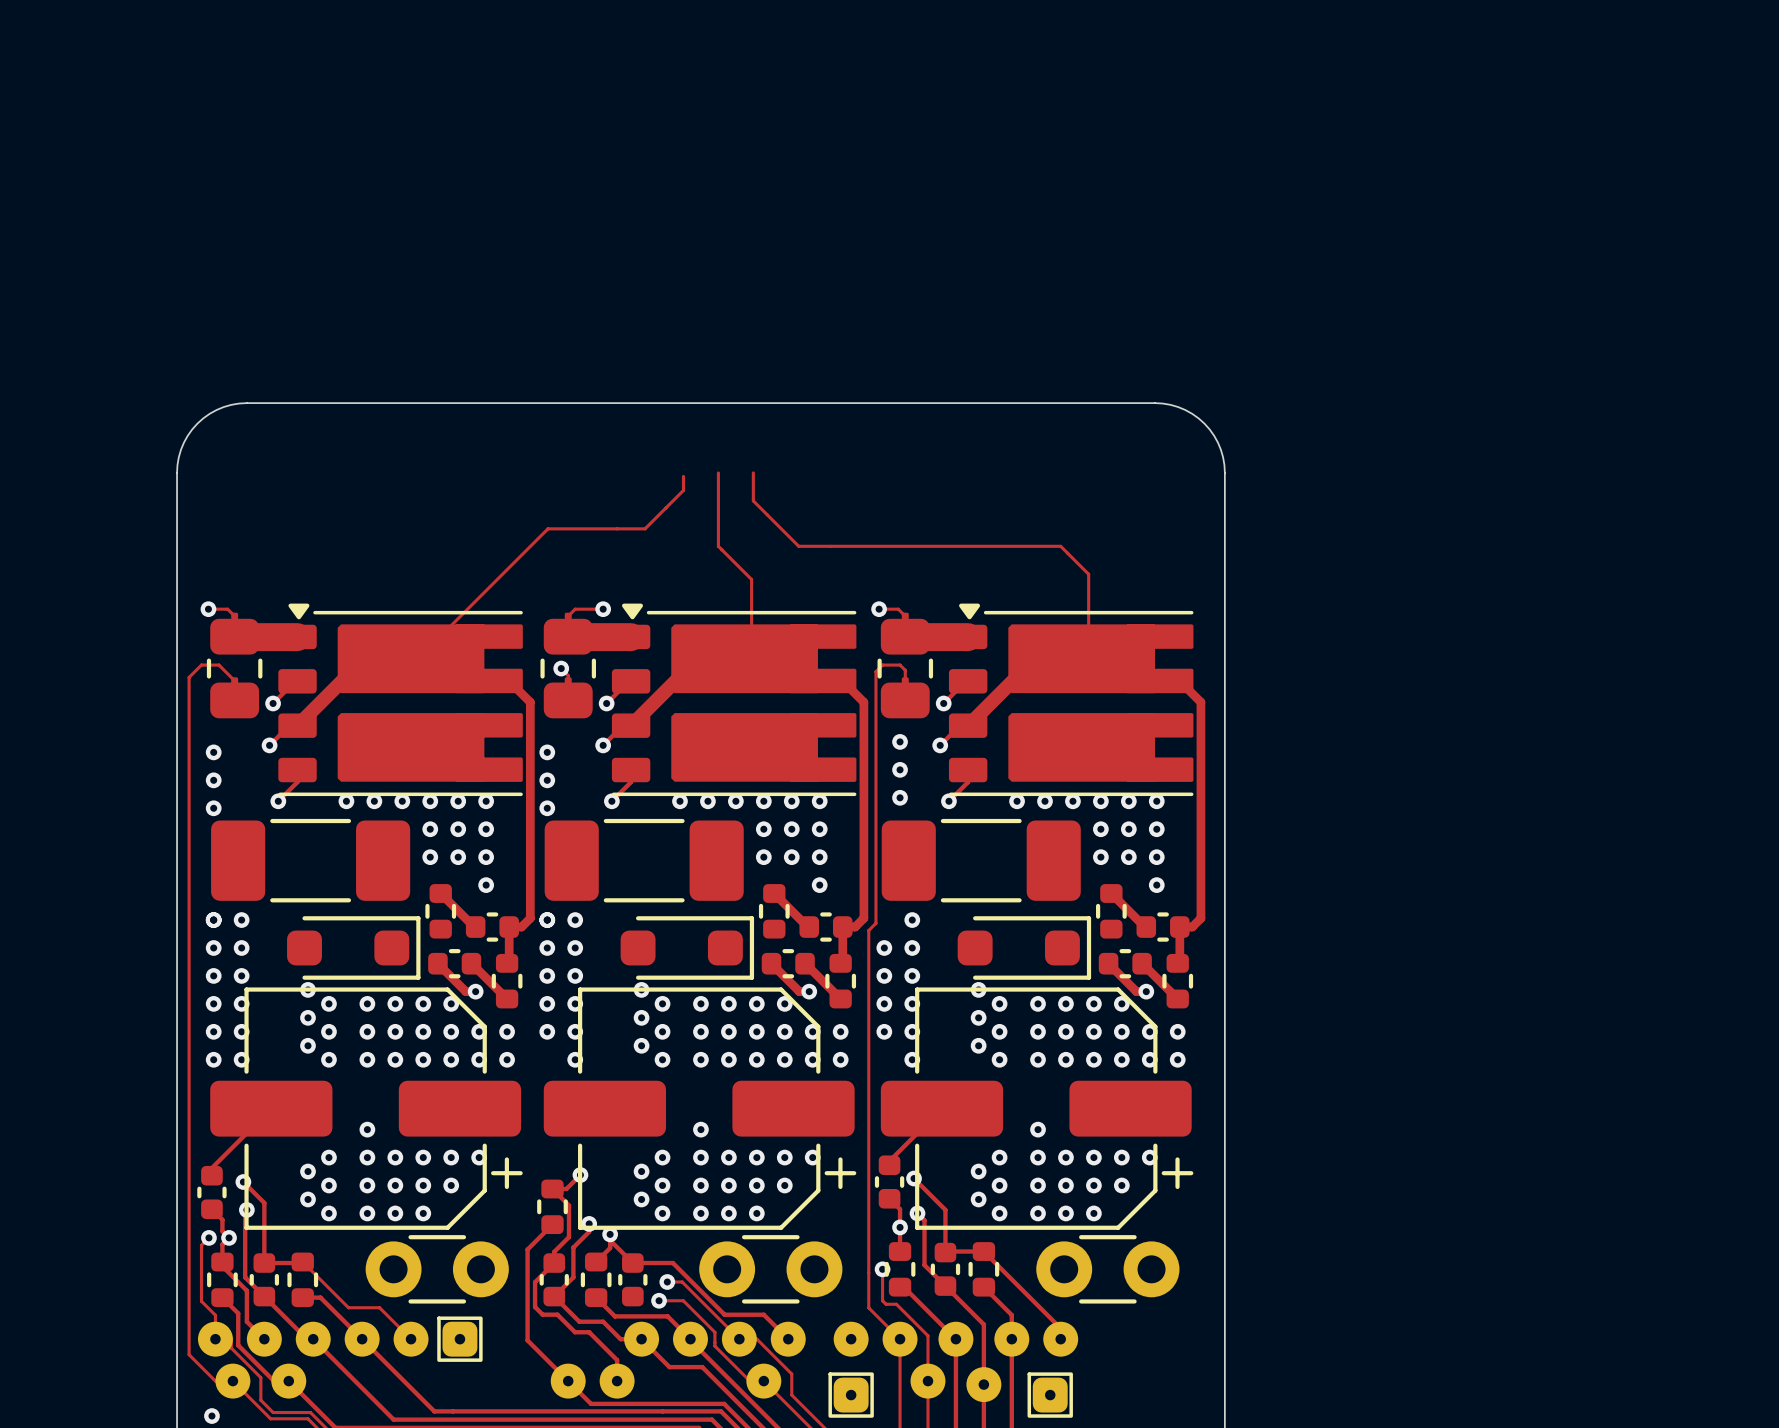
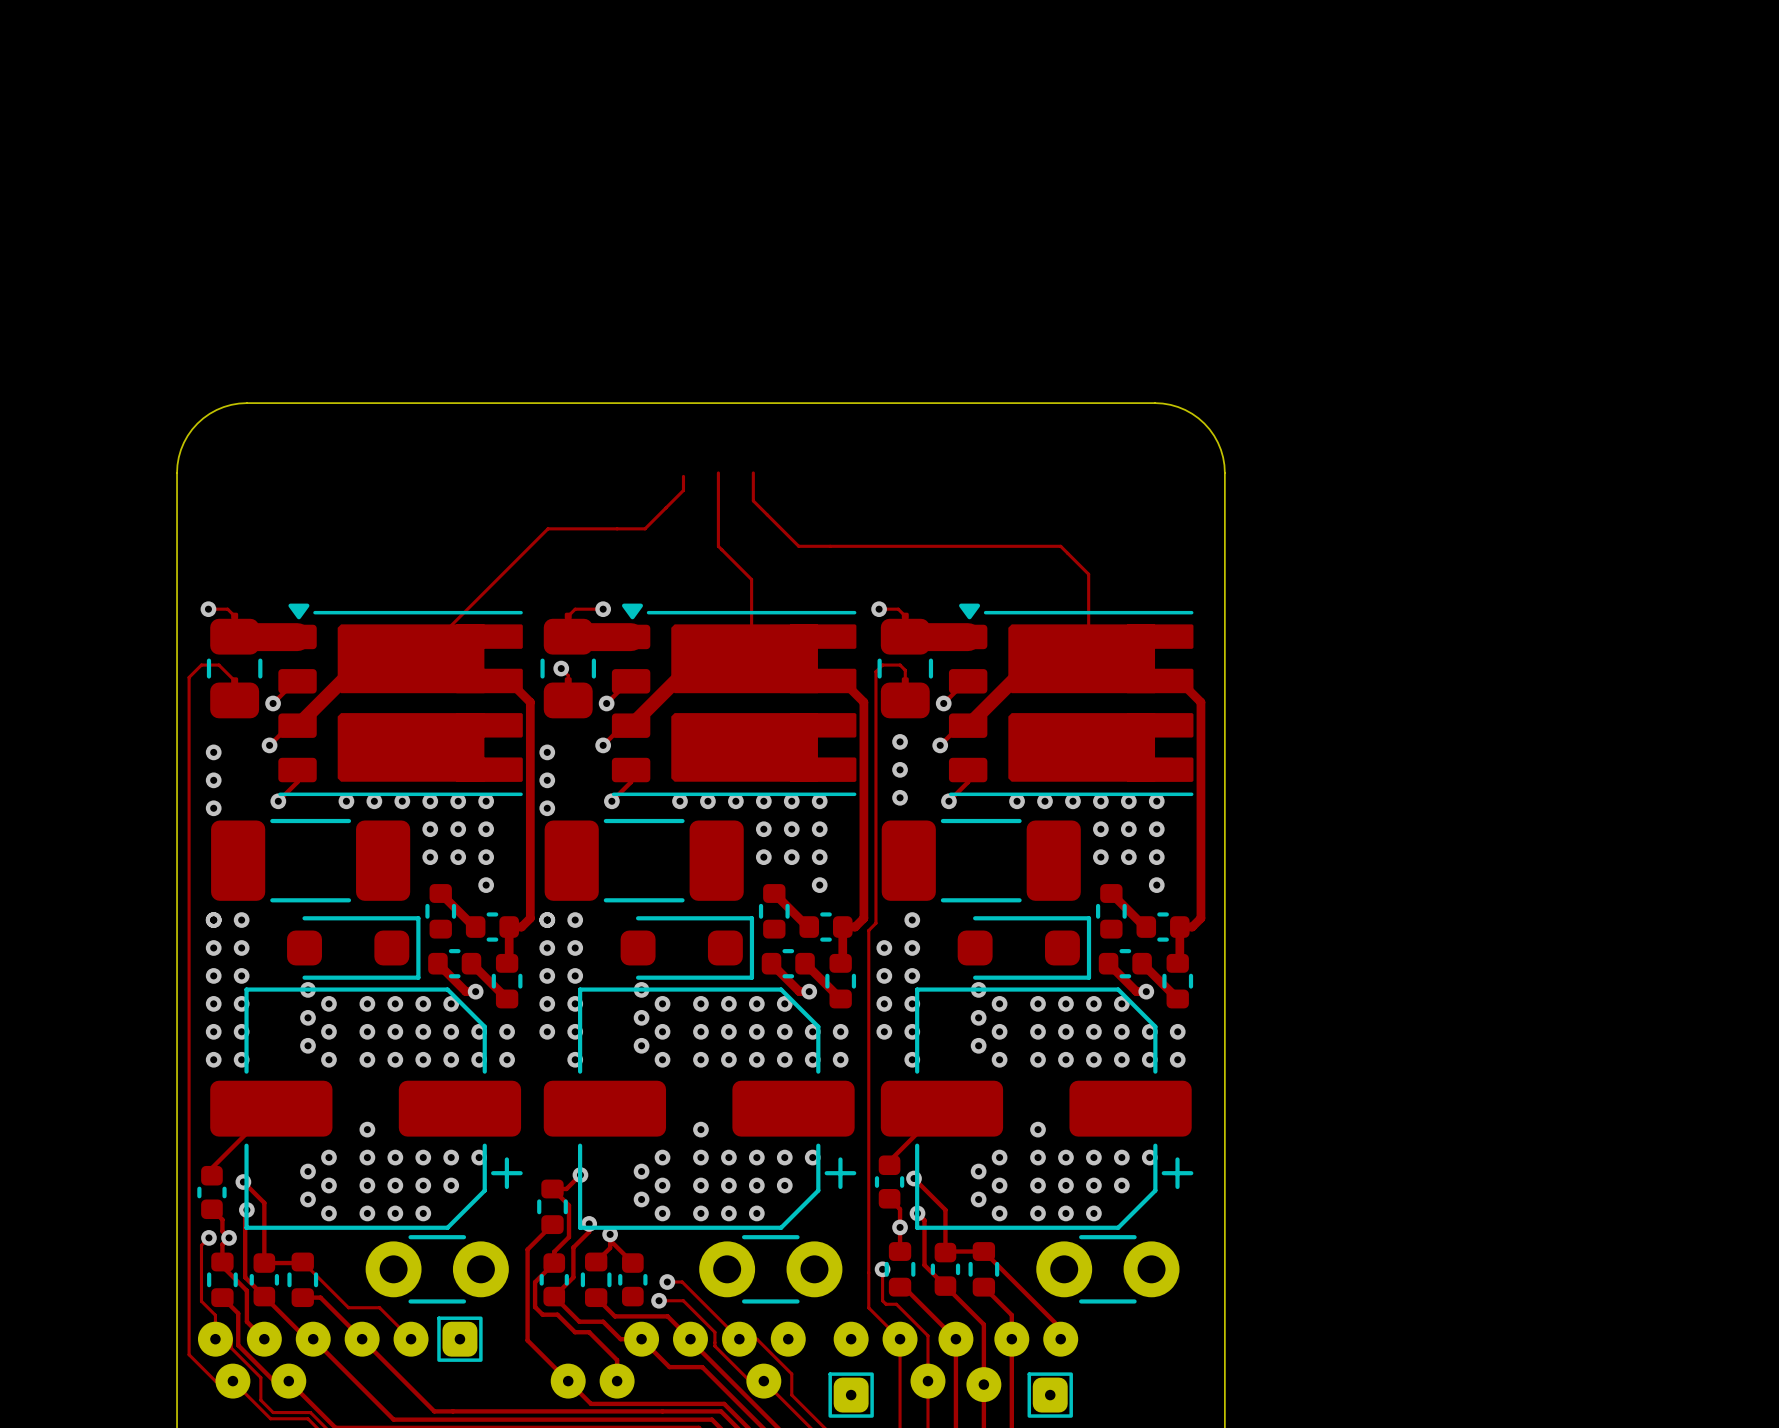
track: (632, 1263) (672, 1263) (724, 1314) (763, 1314) (788, 1339) -> none
via: (211, 1416) -> none

